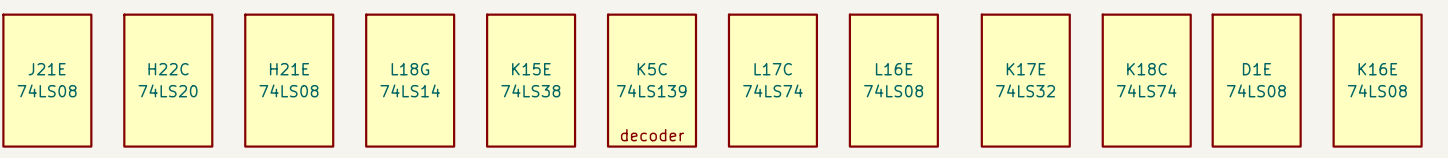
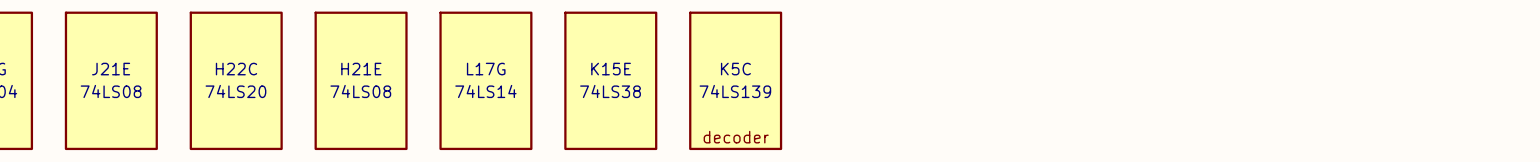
L18G name: L18G (410, 69) -> L17G (486, 69)
L17C: 74LS74 (772, 80) -> none
L16E: 74LS08 (893, 80) -> none
K17E: 74LS32 (1025, 80) -> none
K18C: 74LS74 (1146, 80) -> none
D1E: 74LS08 (1256, 80) -> none
K16E: 74LS08 (1377, 80) -> none

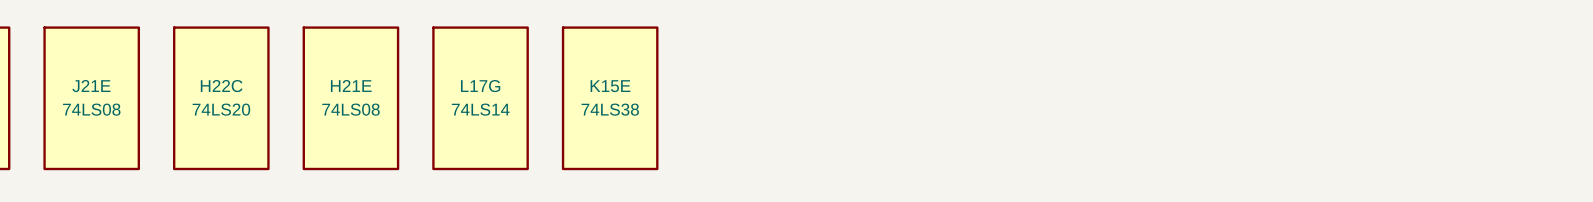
K5C: 74LS139 (735, 80) -> none

